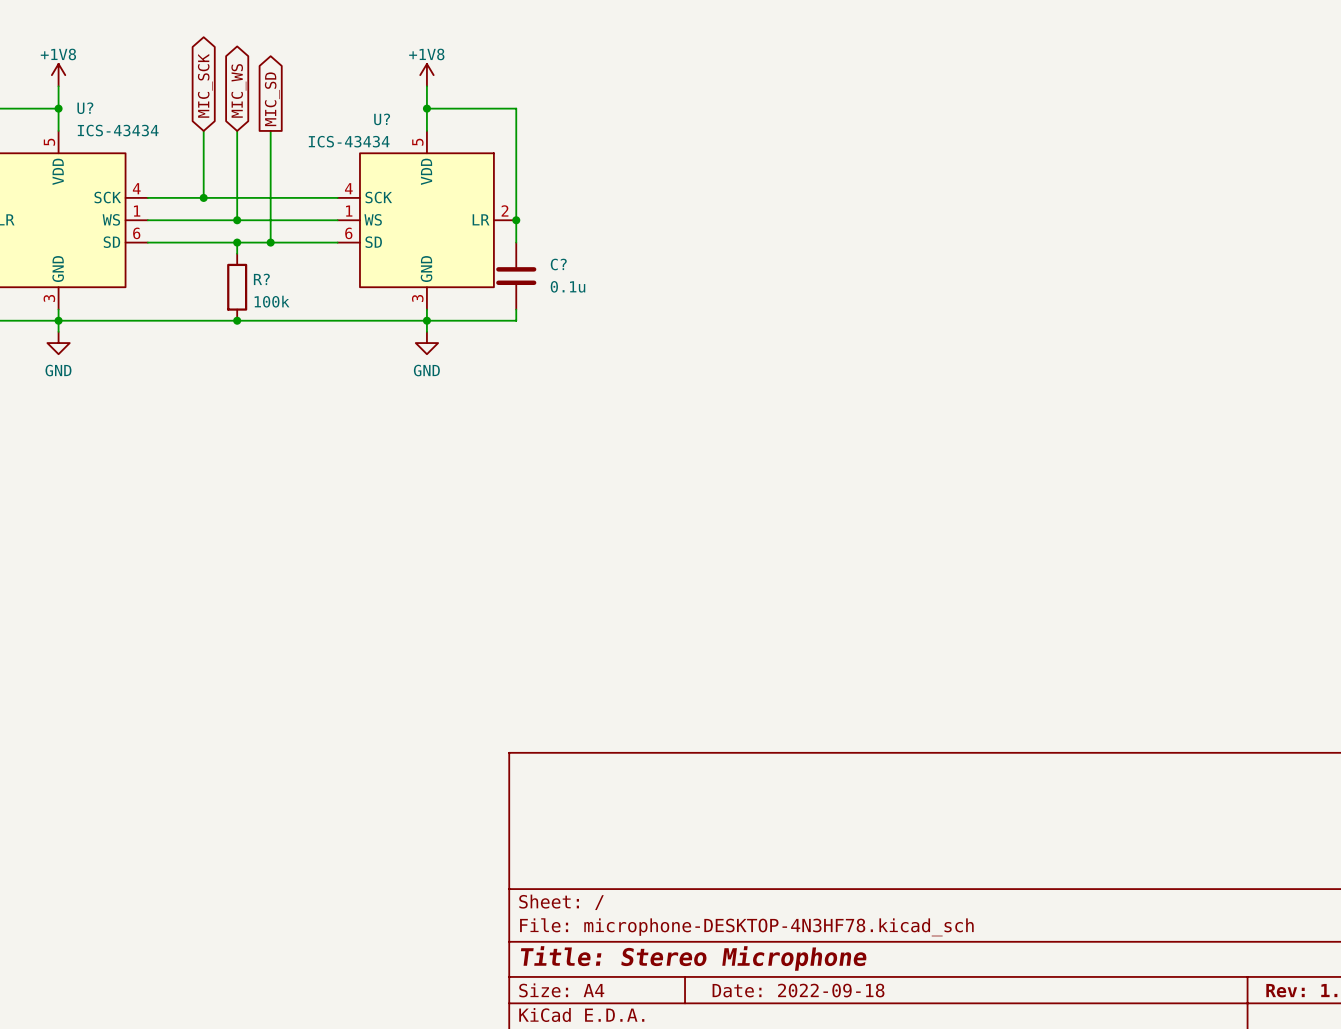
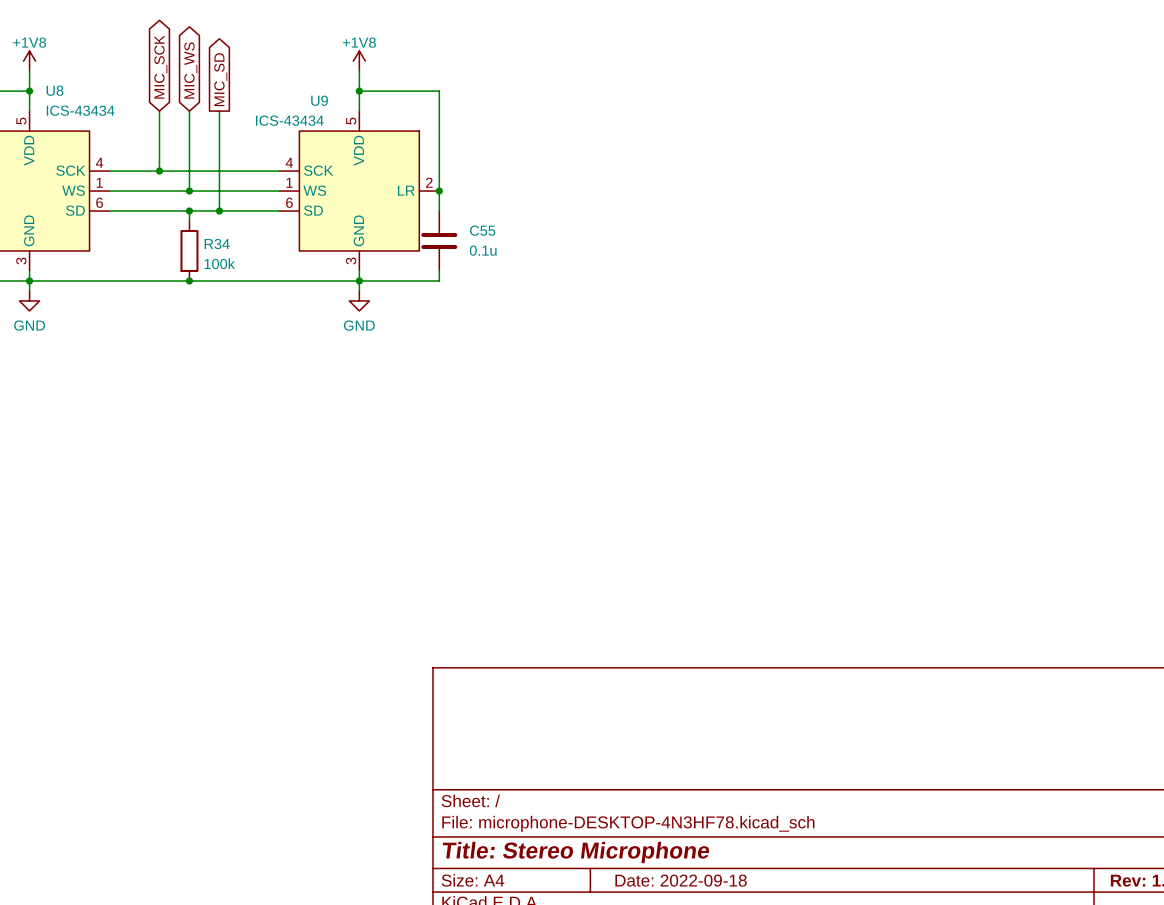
U? name: U? (85, 108) -> U8 (54, 90)
U? name: U? (382, 119) -> U9 (319, 100)
C? name: C? (558, 264) -> C55 (482, 230)
R? name: R? (261, 279) -> R34 (217, 244)

